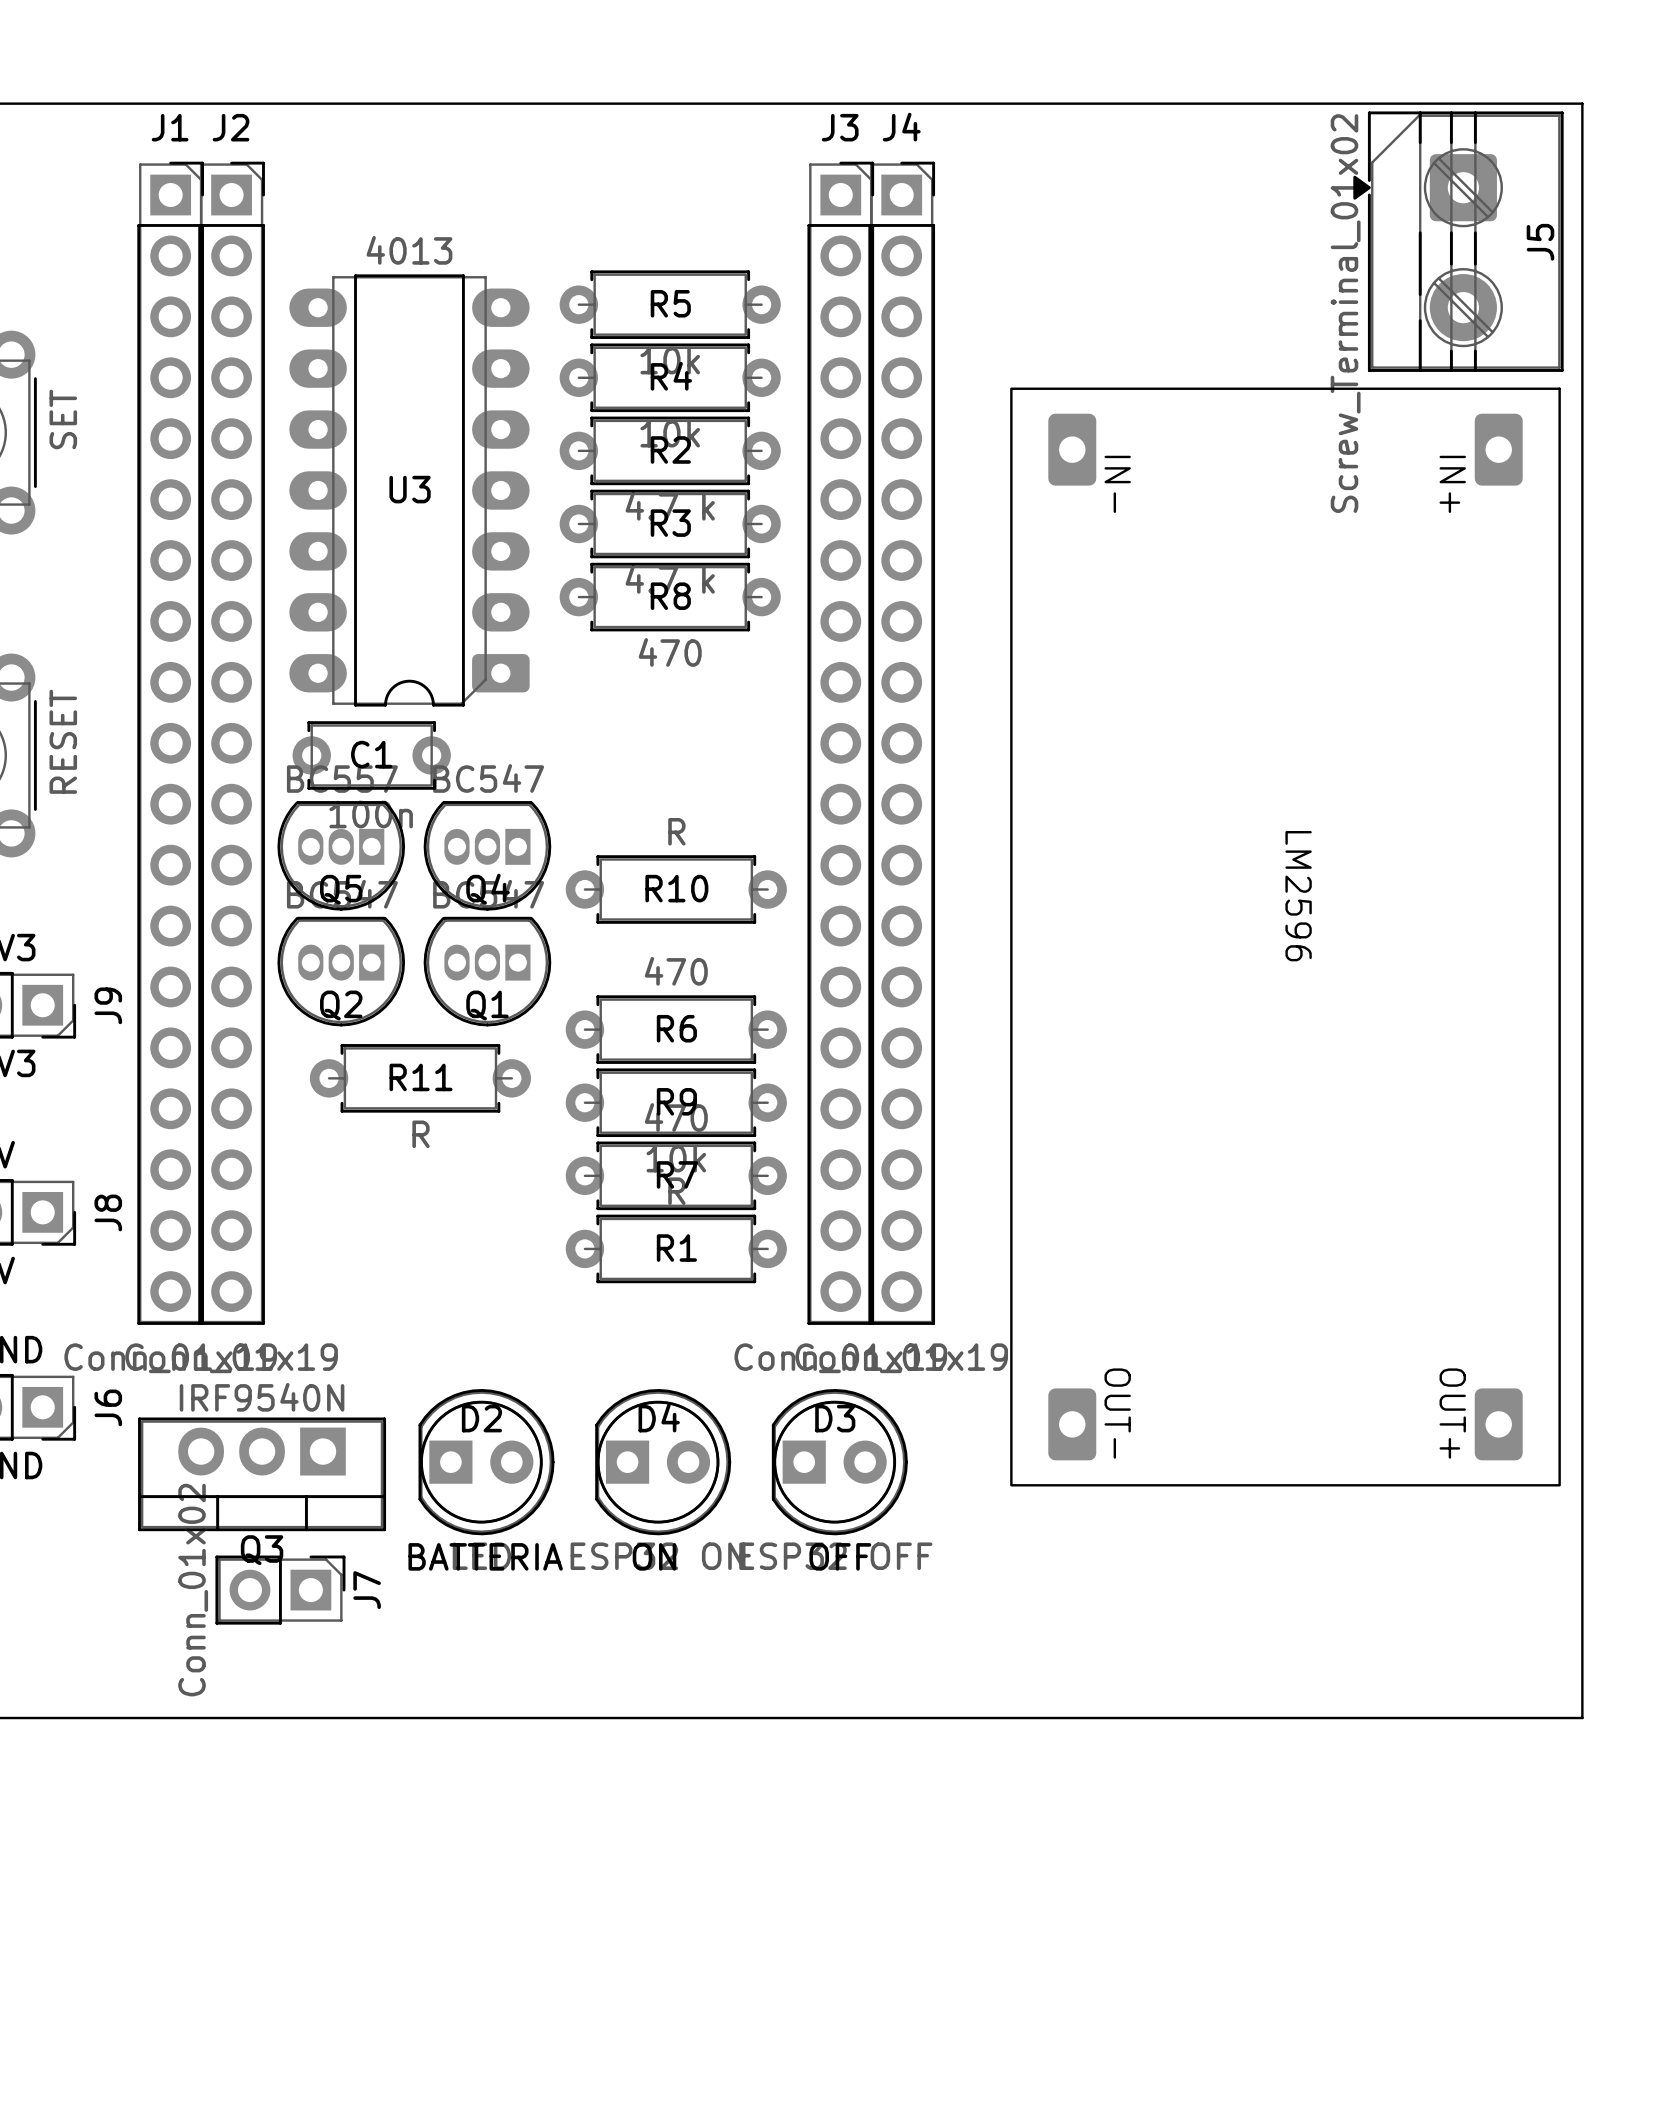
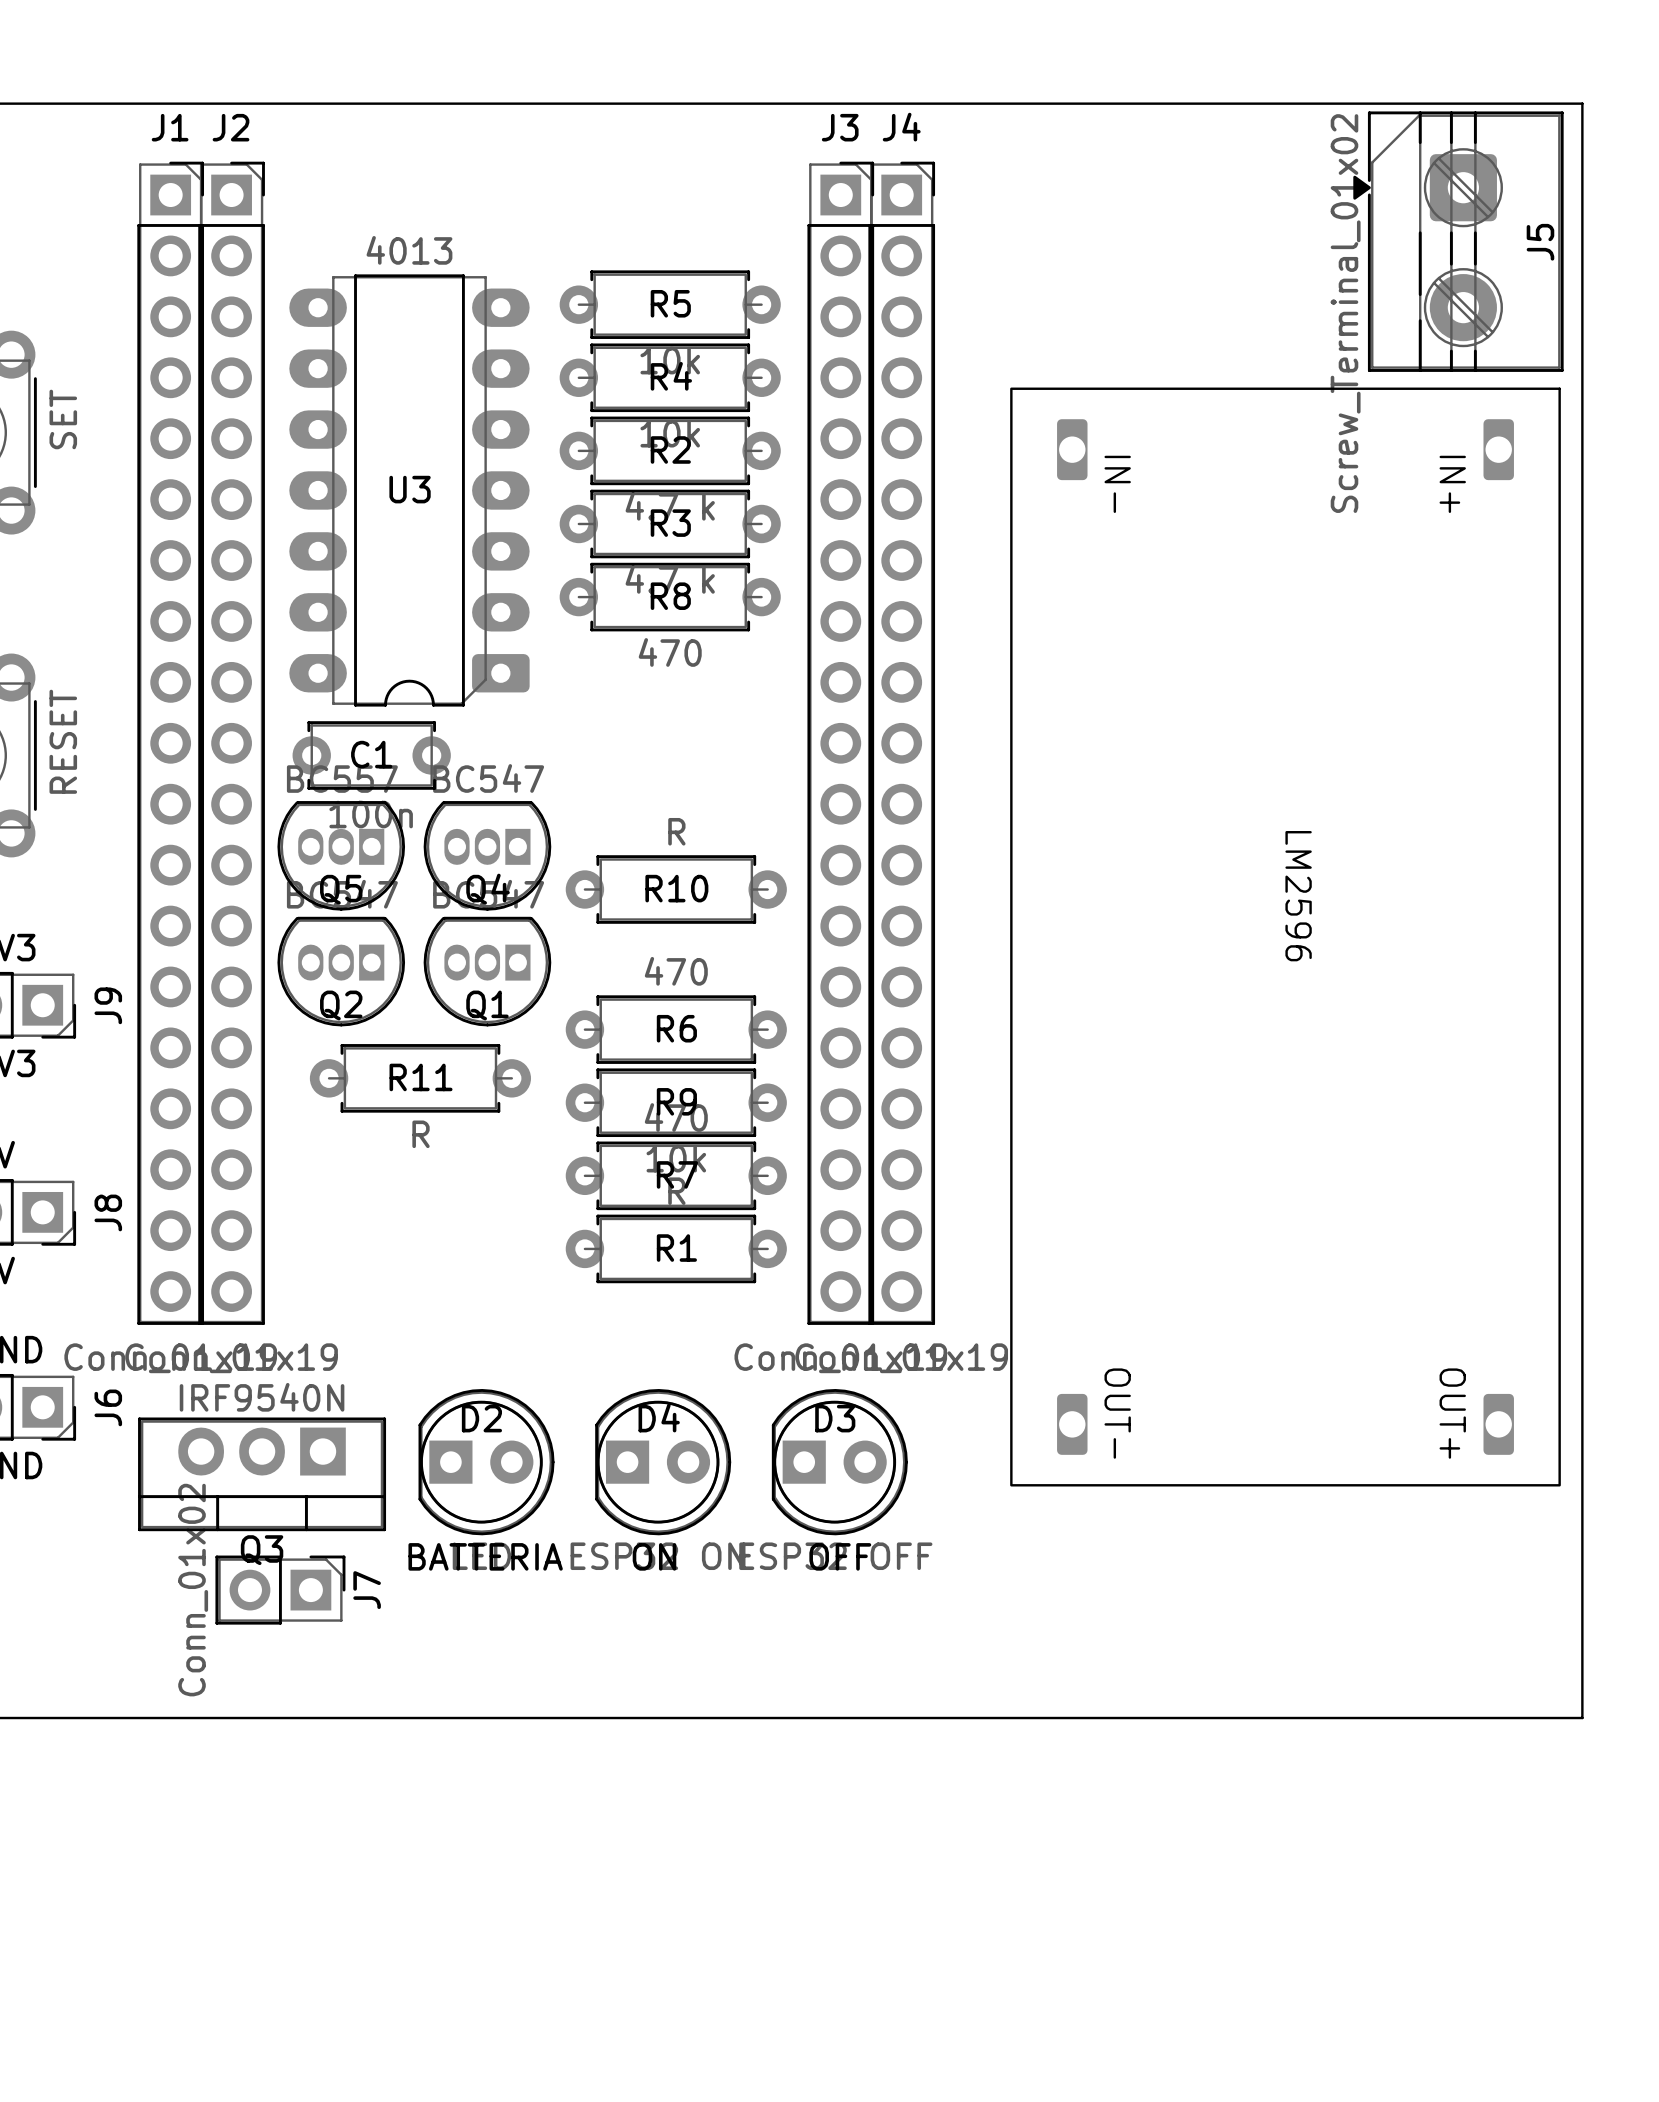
LM2596 footprint: [1010, 387, 1561, 1487] -> [1010, 387, 1561, 1487]

